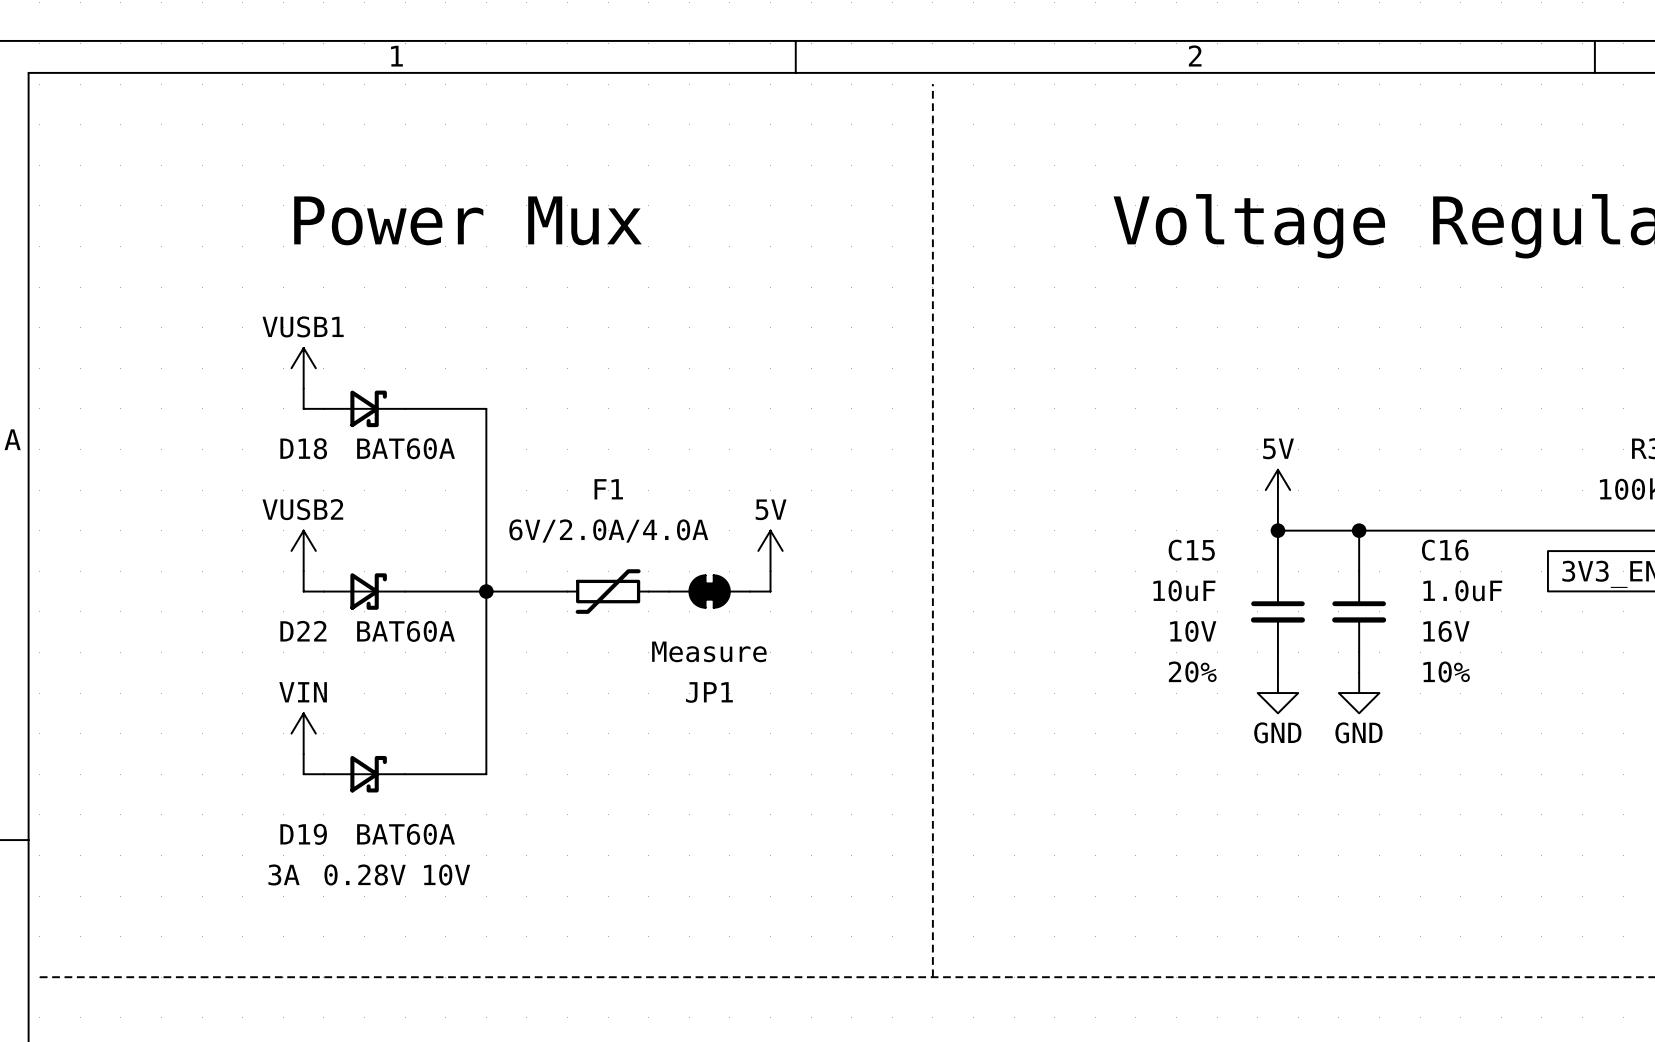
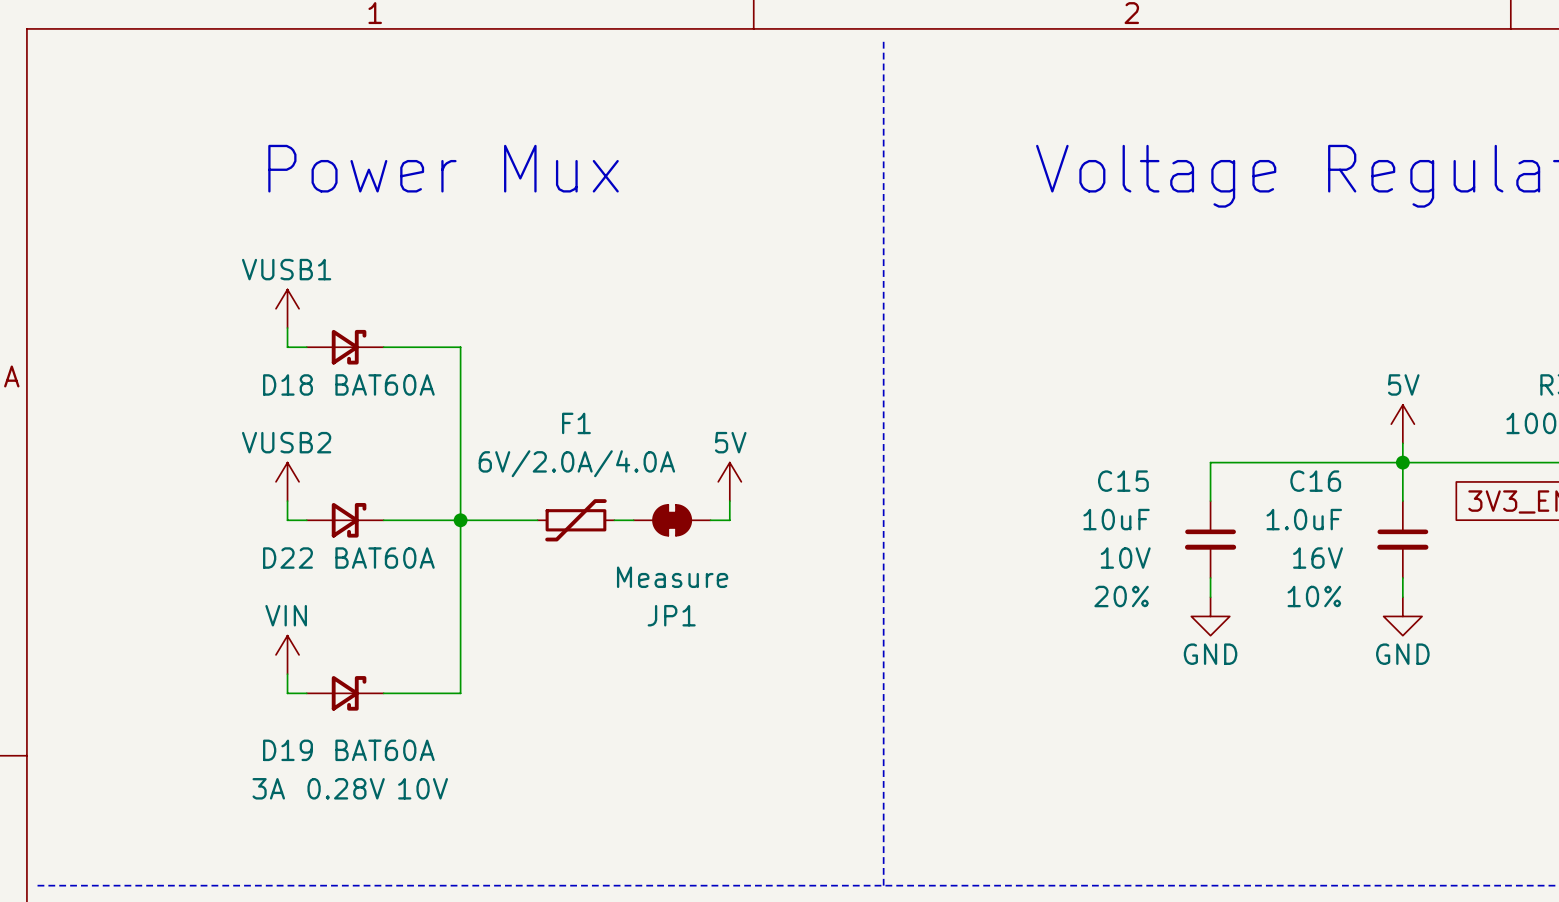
power symbol position: 5V (1277, 490) -> 5V (1402, 424)
wire: (1277, 510) (1277, 530) -> none
wire: none -> (1402, 443) (1402, 501)
junction: (1277, 530) -> none
wire: (1359, 530) (1359, 571) -> none
junction: (1359, 530) -> none
junction: none -> (1402, 462)
C16 name position: C16 (1445, 550) -> C16 (1315, 481)
C16 value position: 1.0uF (1462, 590) -> 1.0uF (1304, 519)
C16 position: (1359, 611) -> (1402, 539)
C16 text position: 16V (1446, 631) -> 16V (1318, 558)
wire: (1359, 652) (1359, 672) -> (1402, 577) (1402, 597)
C16 text position: 10% (1446, 671) -> 10% (1314, 596)
power symbol position: GND (1359, 693) -> GND (1402, 616)

